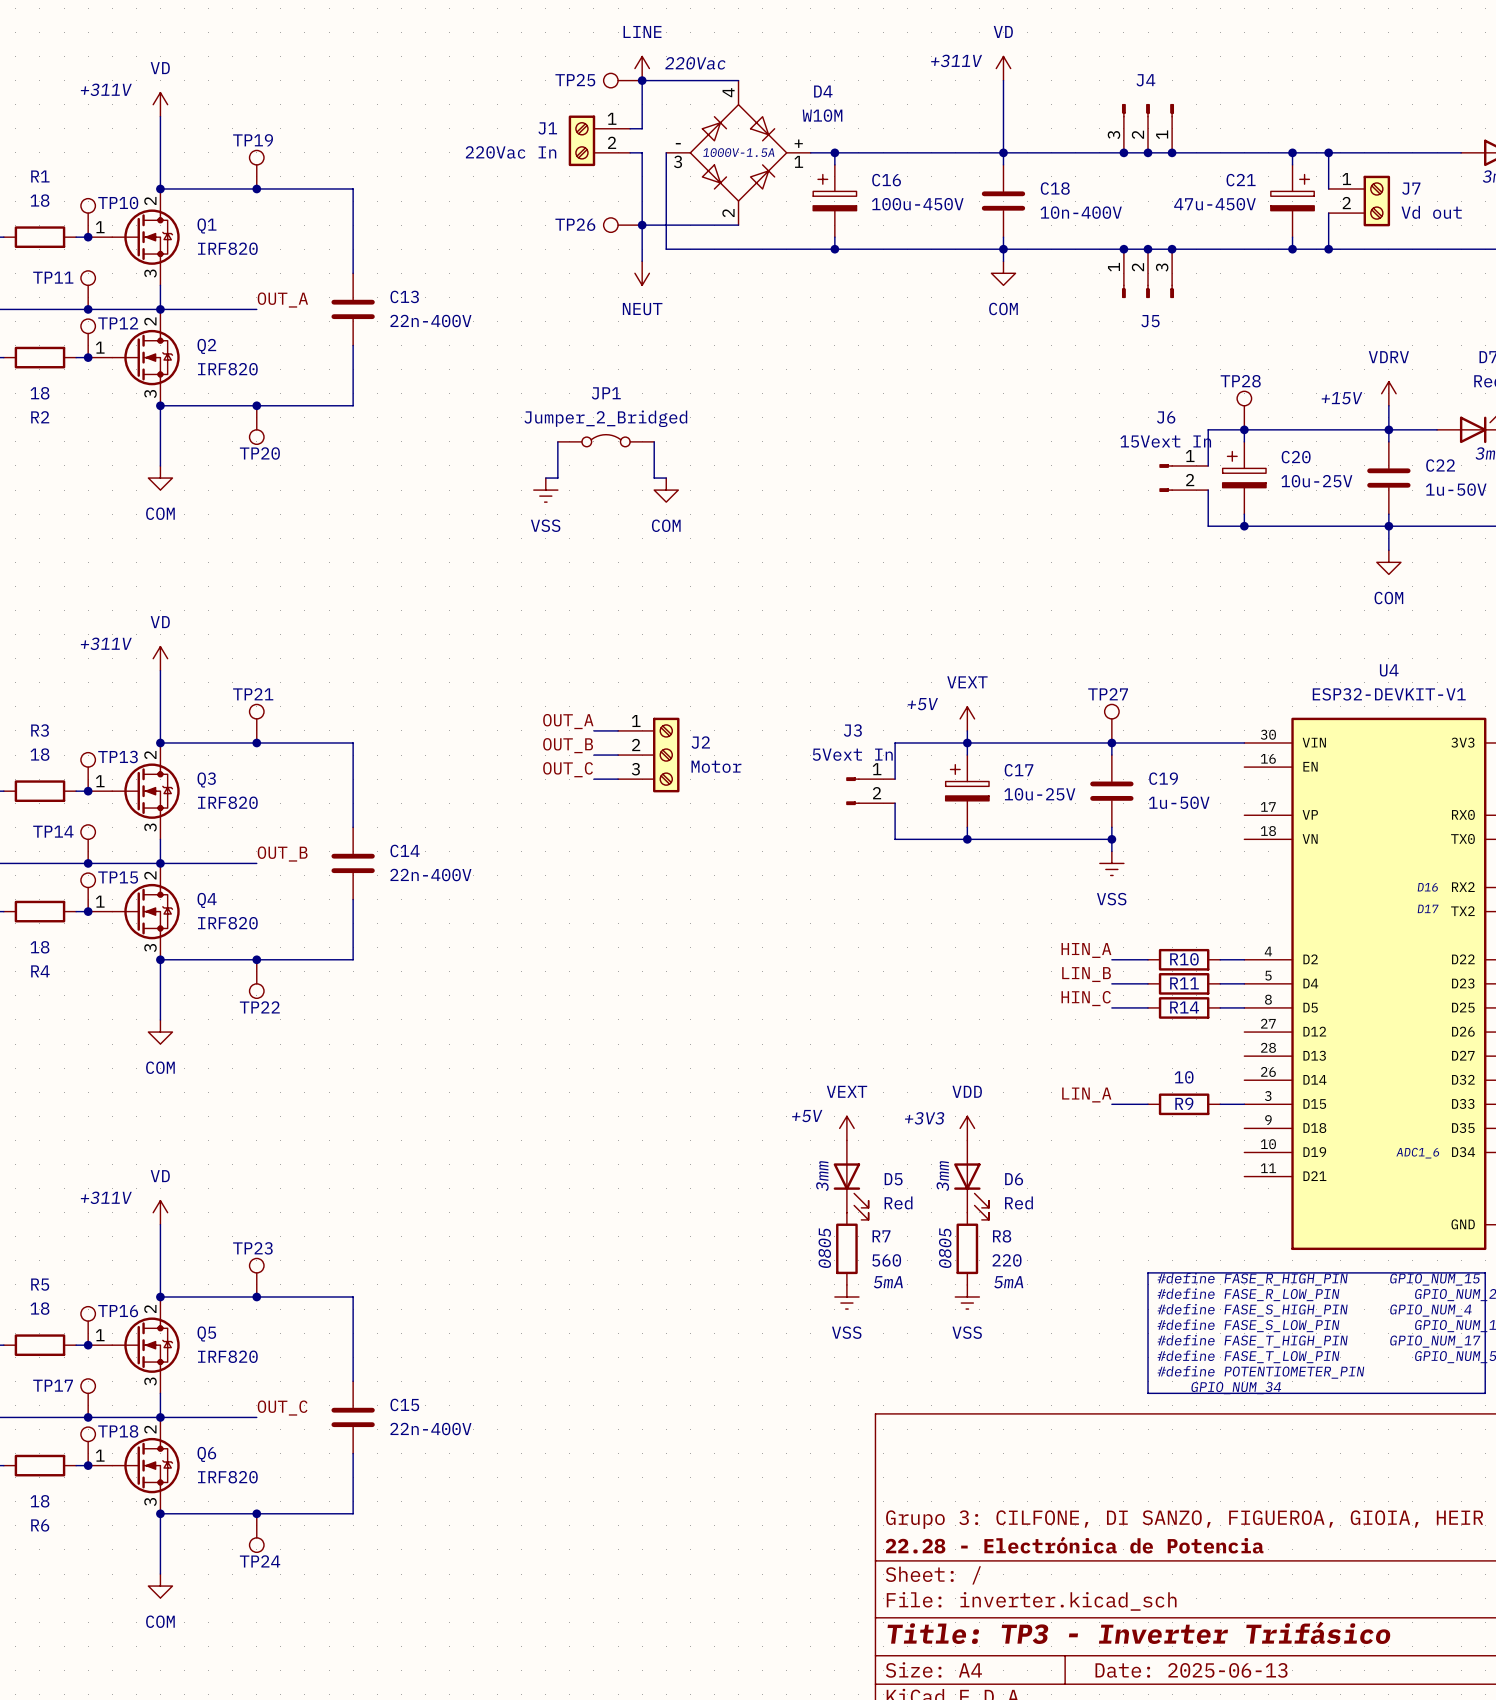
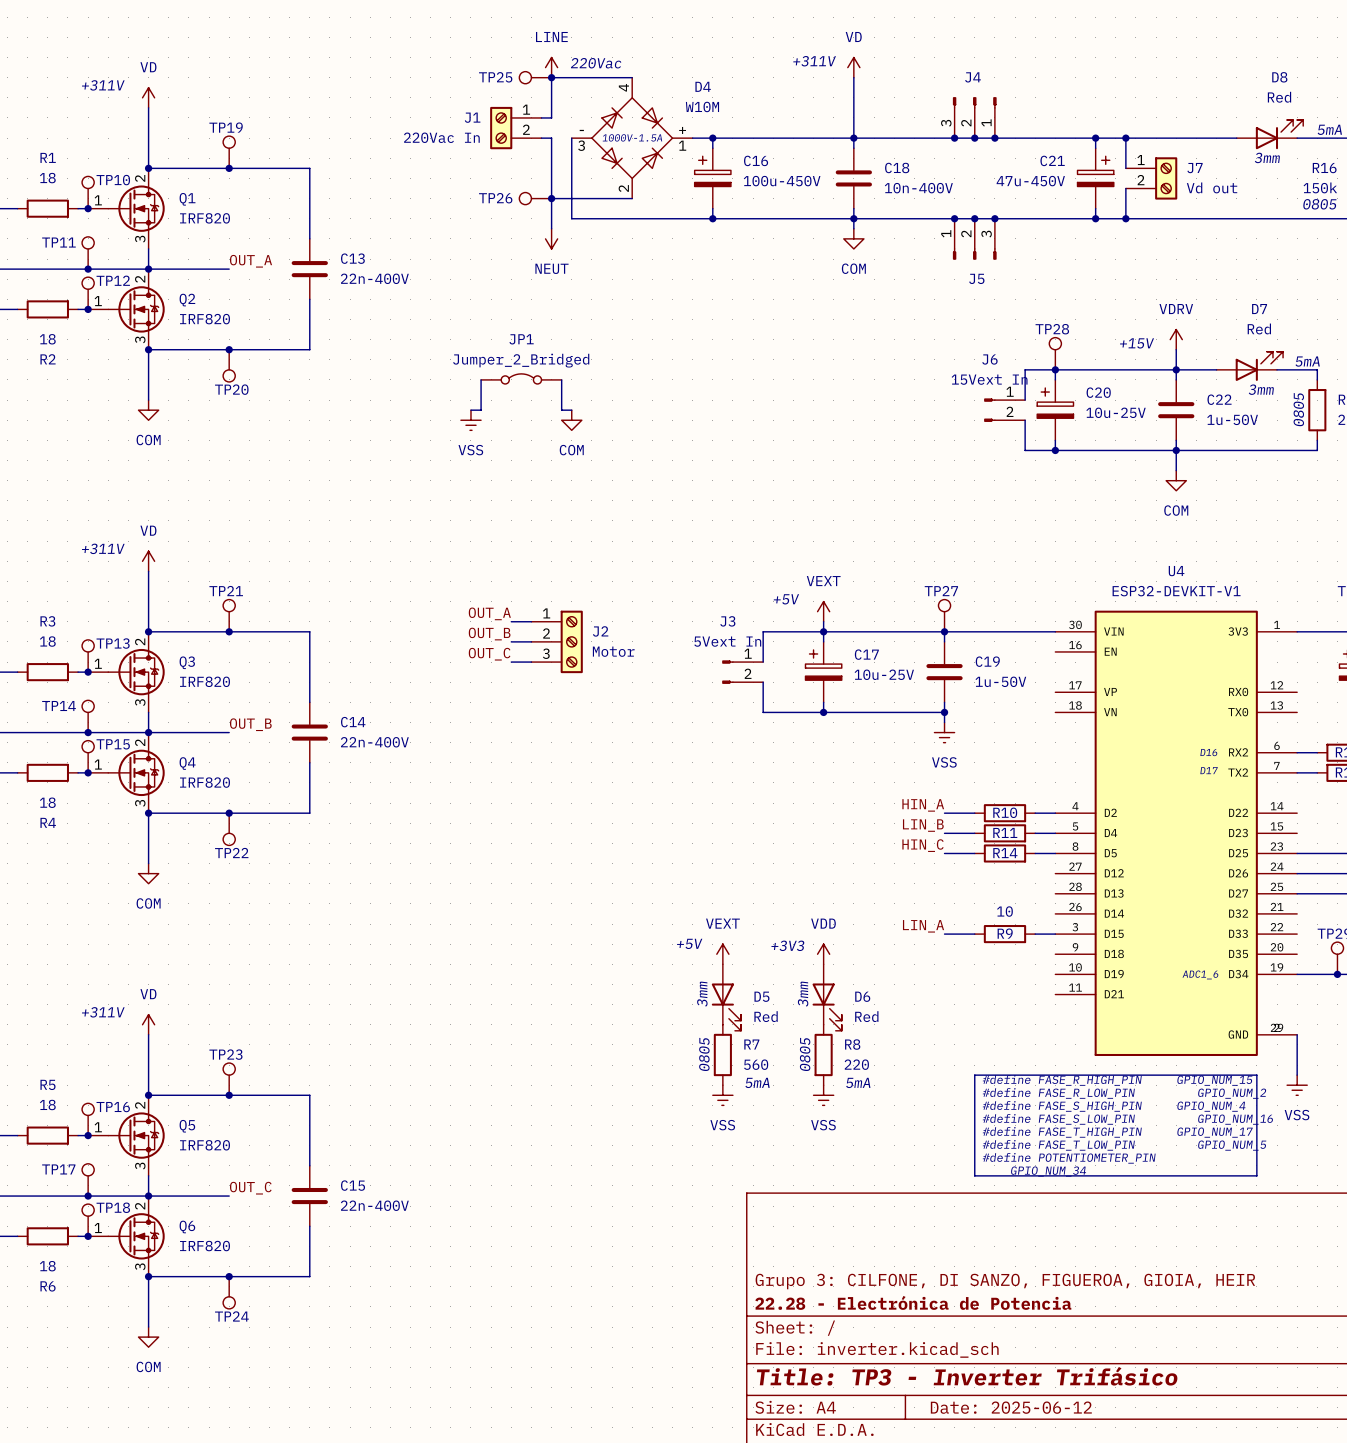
title block: Date: 2025-06-13 (1191, 1670) -> Date: 2025-06-12 (1011, 1407)

